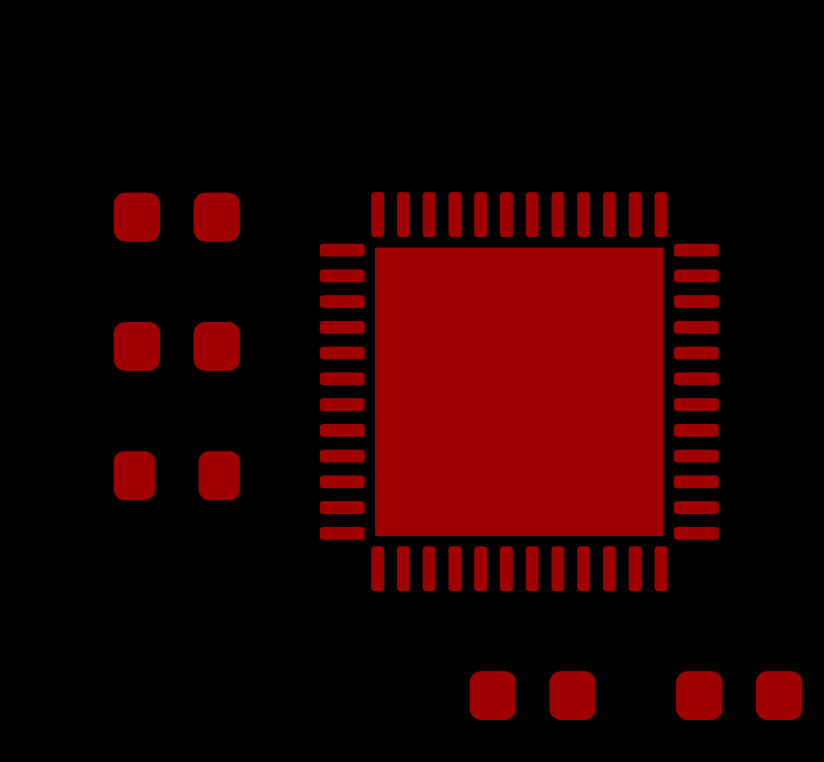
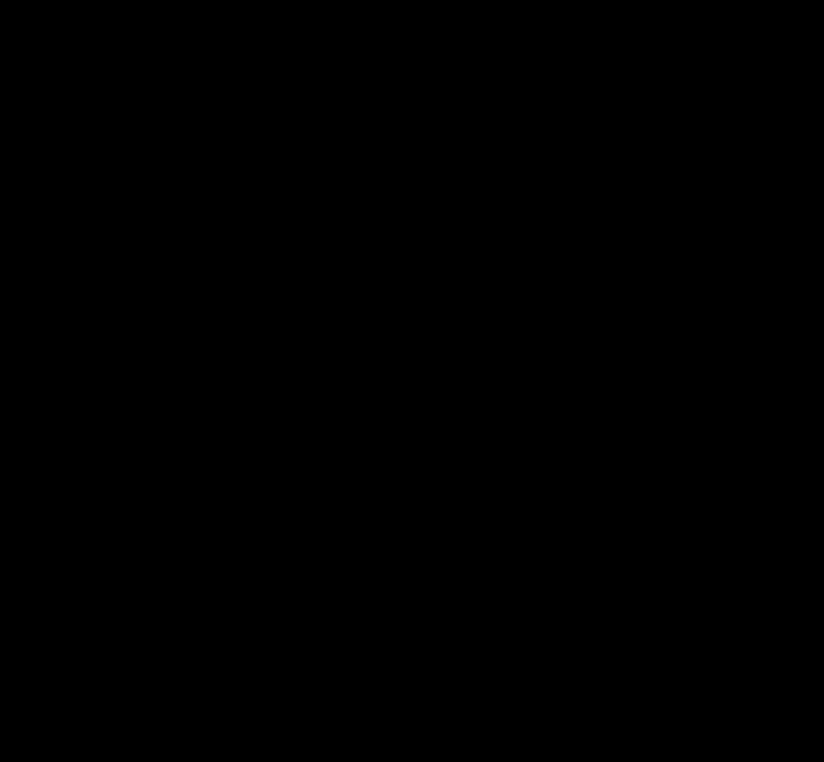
part: (176, 217) -> none
part: (176, 346) -> none
part: (519, 391) -> none
part: (176, 475) -> none
part: (532, 695) -> none
part: (739, 695) -> none

